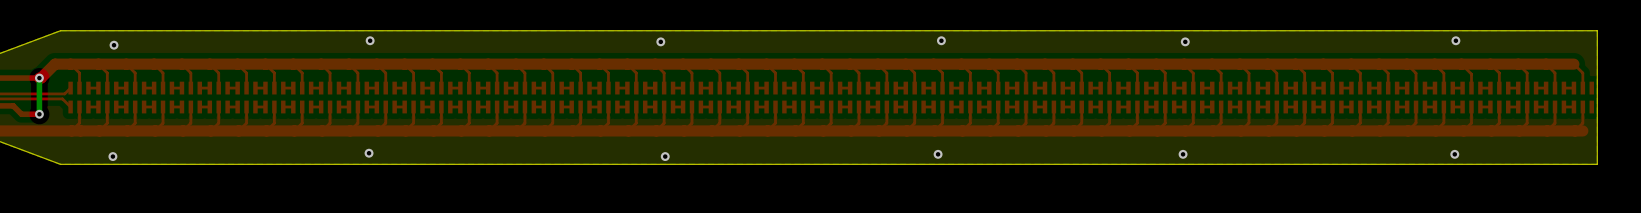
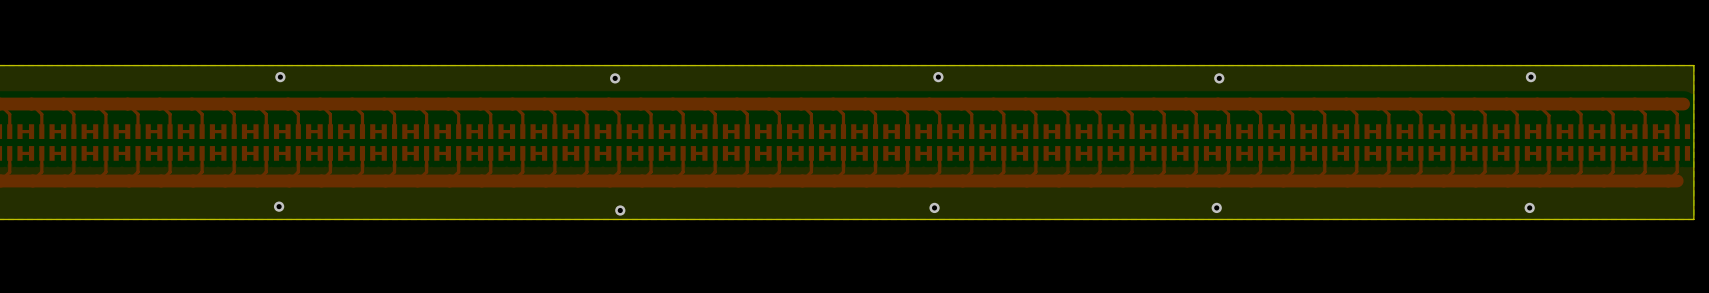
top track: none -> (1683, 104) (1666, 104)

